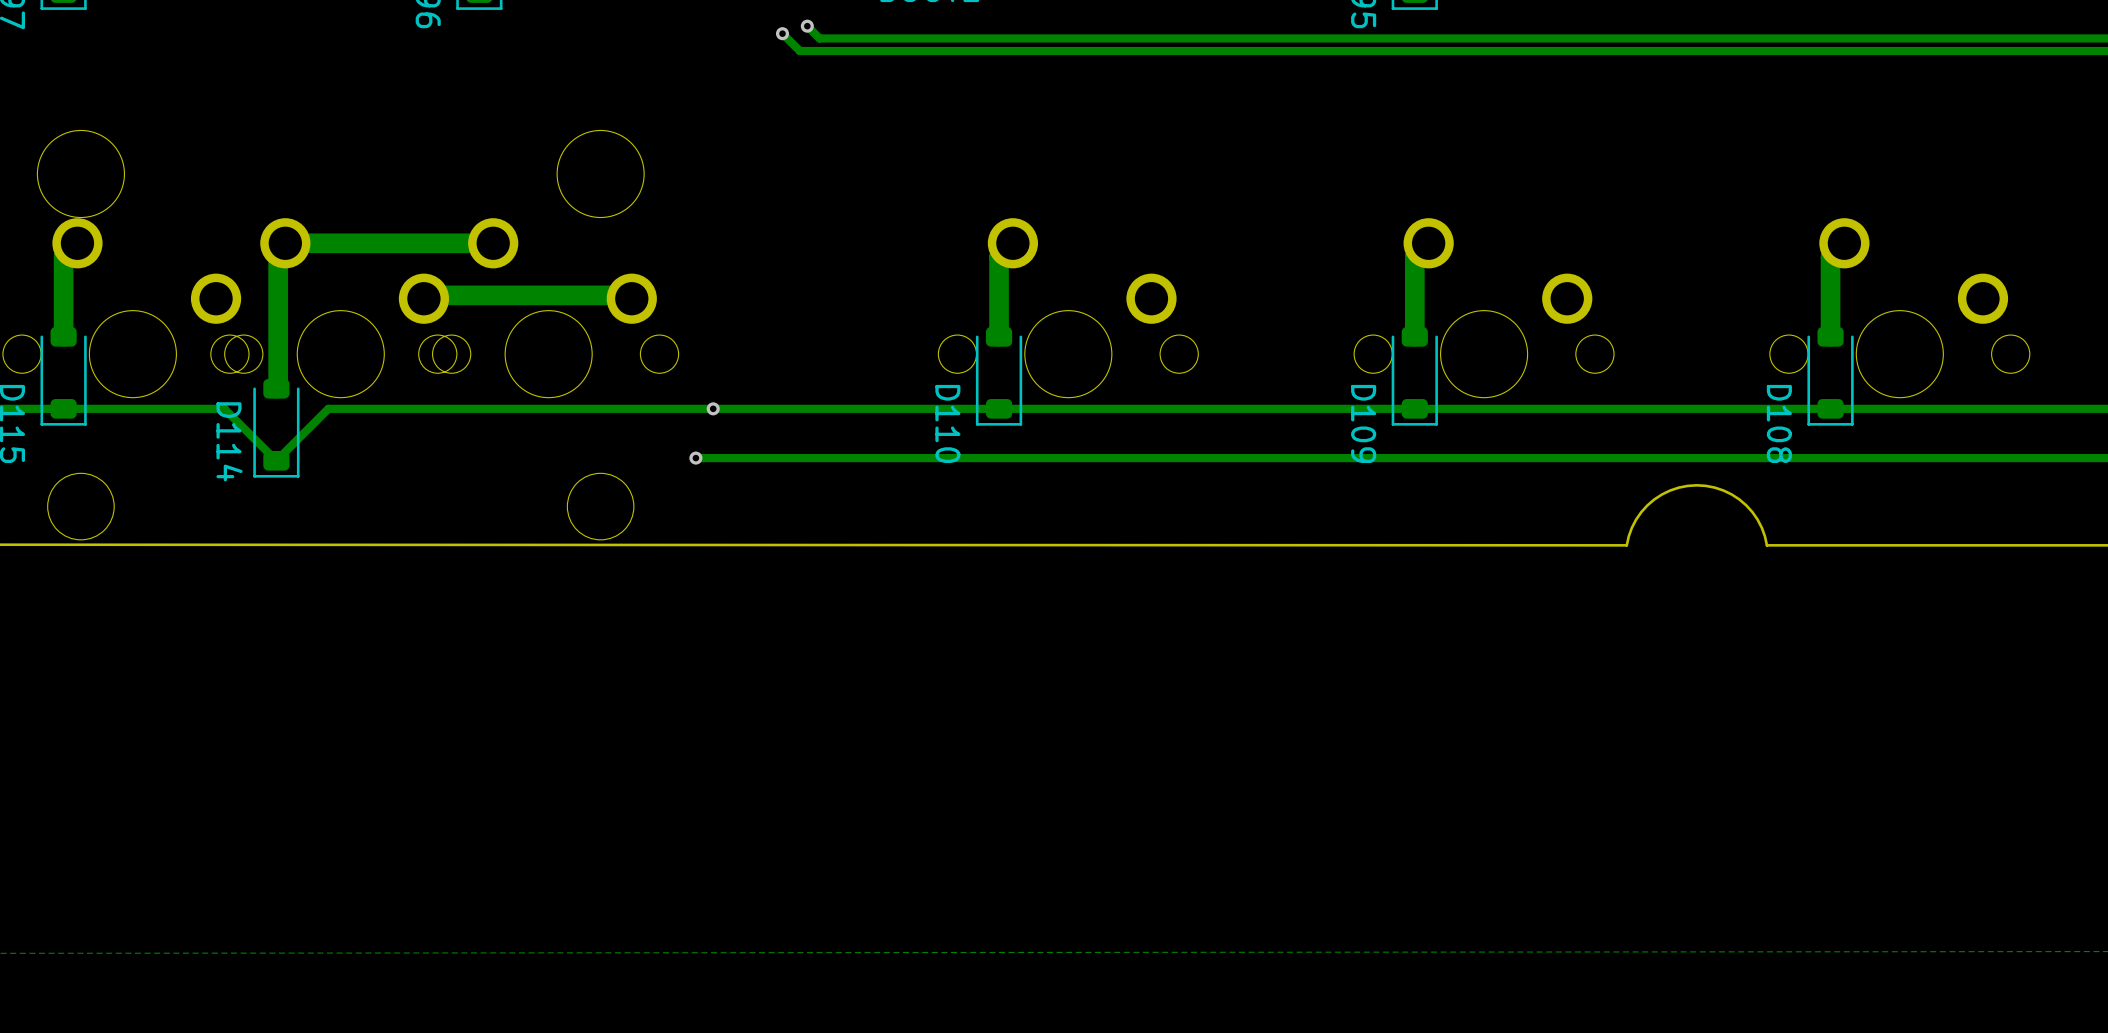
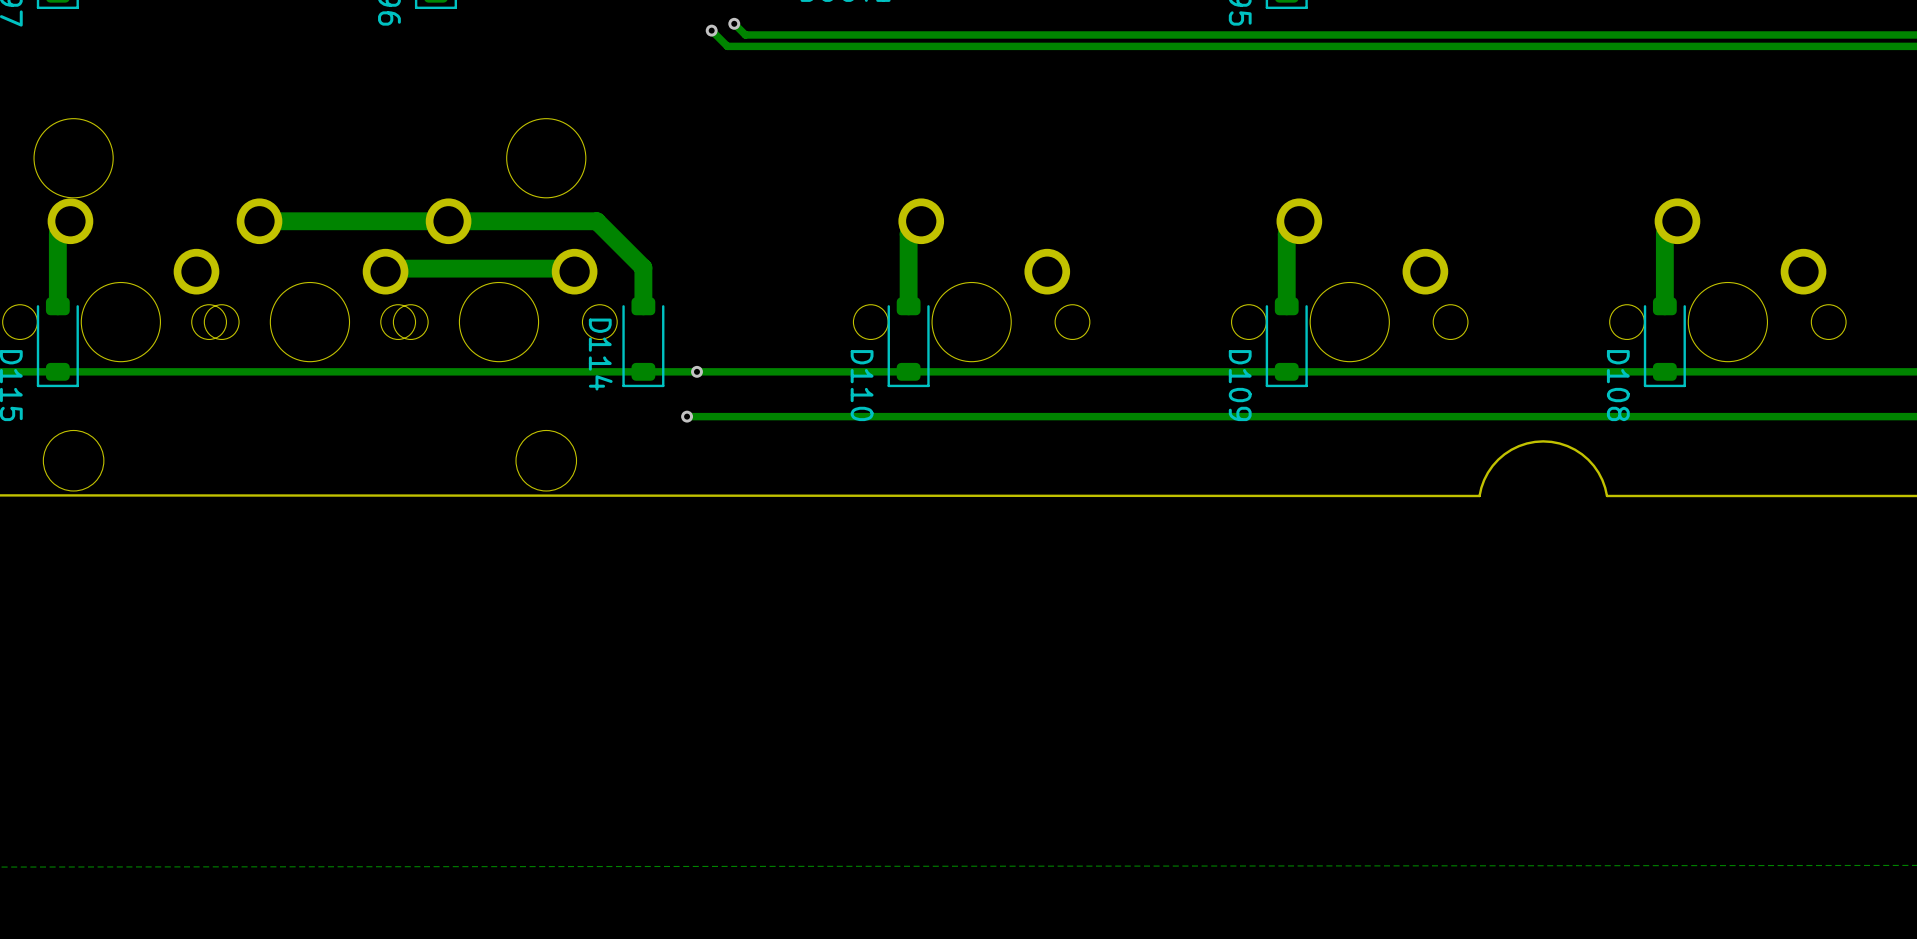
track: none -> (448, 221) (596, 221) (643, 267) (643, 306)
track: (278, 250) (278, 387) (276, 388) -> none
track: (328, 408) (276, 460) (224, 408) -> (298, 371) (204, 371)
via: (713, 408) -> none
via: none -> (696, 371)
D114 position: (276, 428) -> (643, 342)
via: (695, 458) -> none
track: (755, 458) (695, 458) -> none
via: none -> (687, 416)

